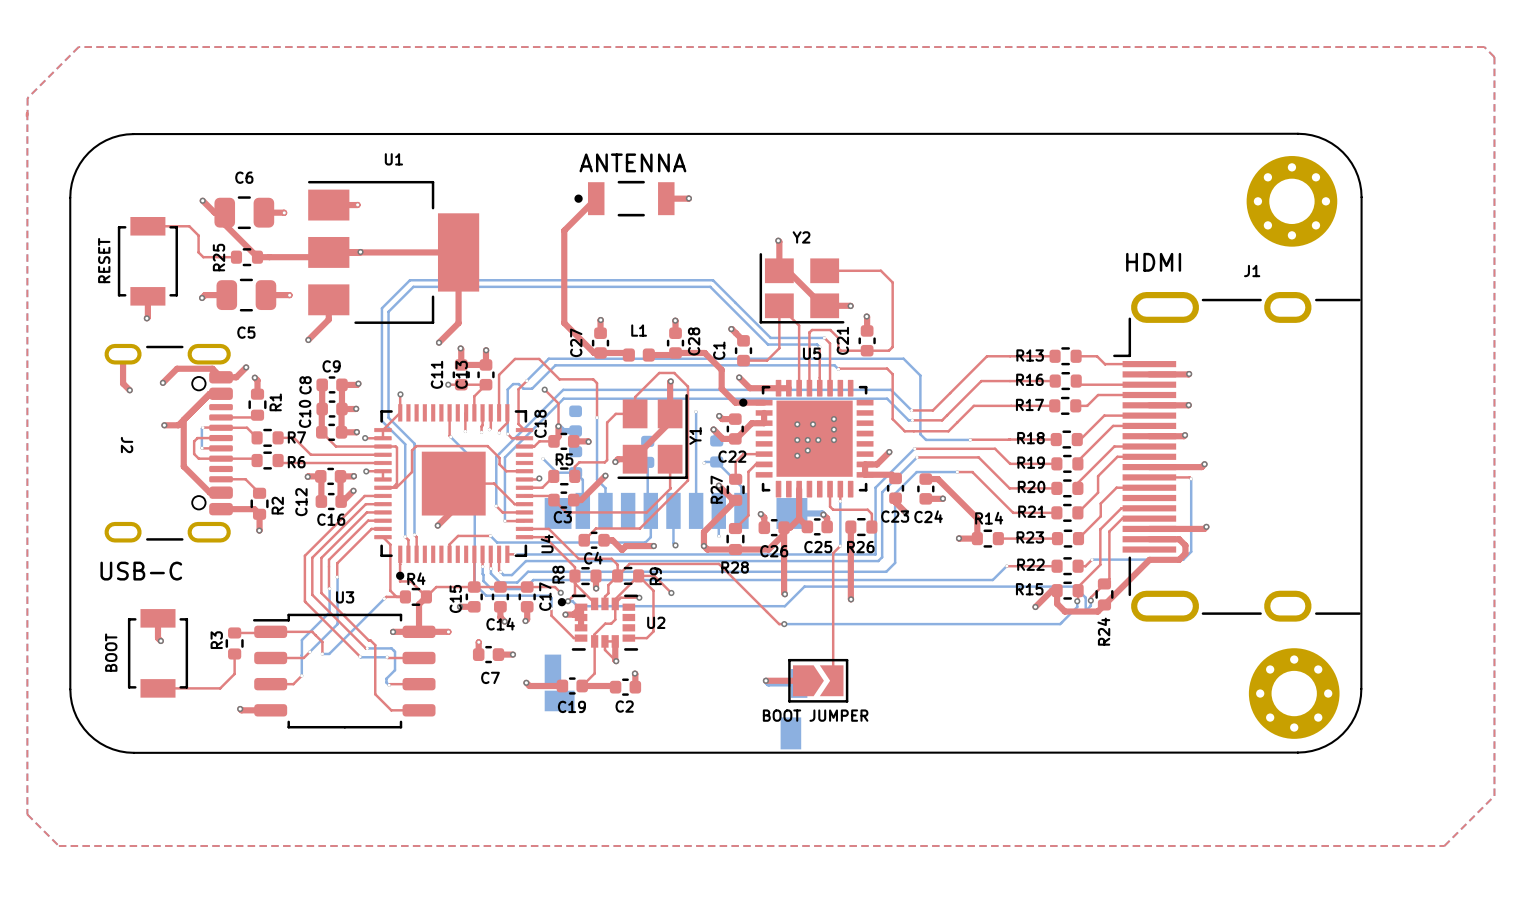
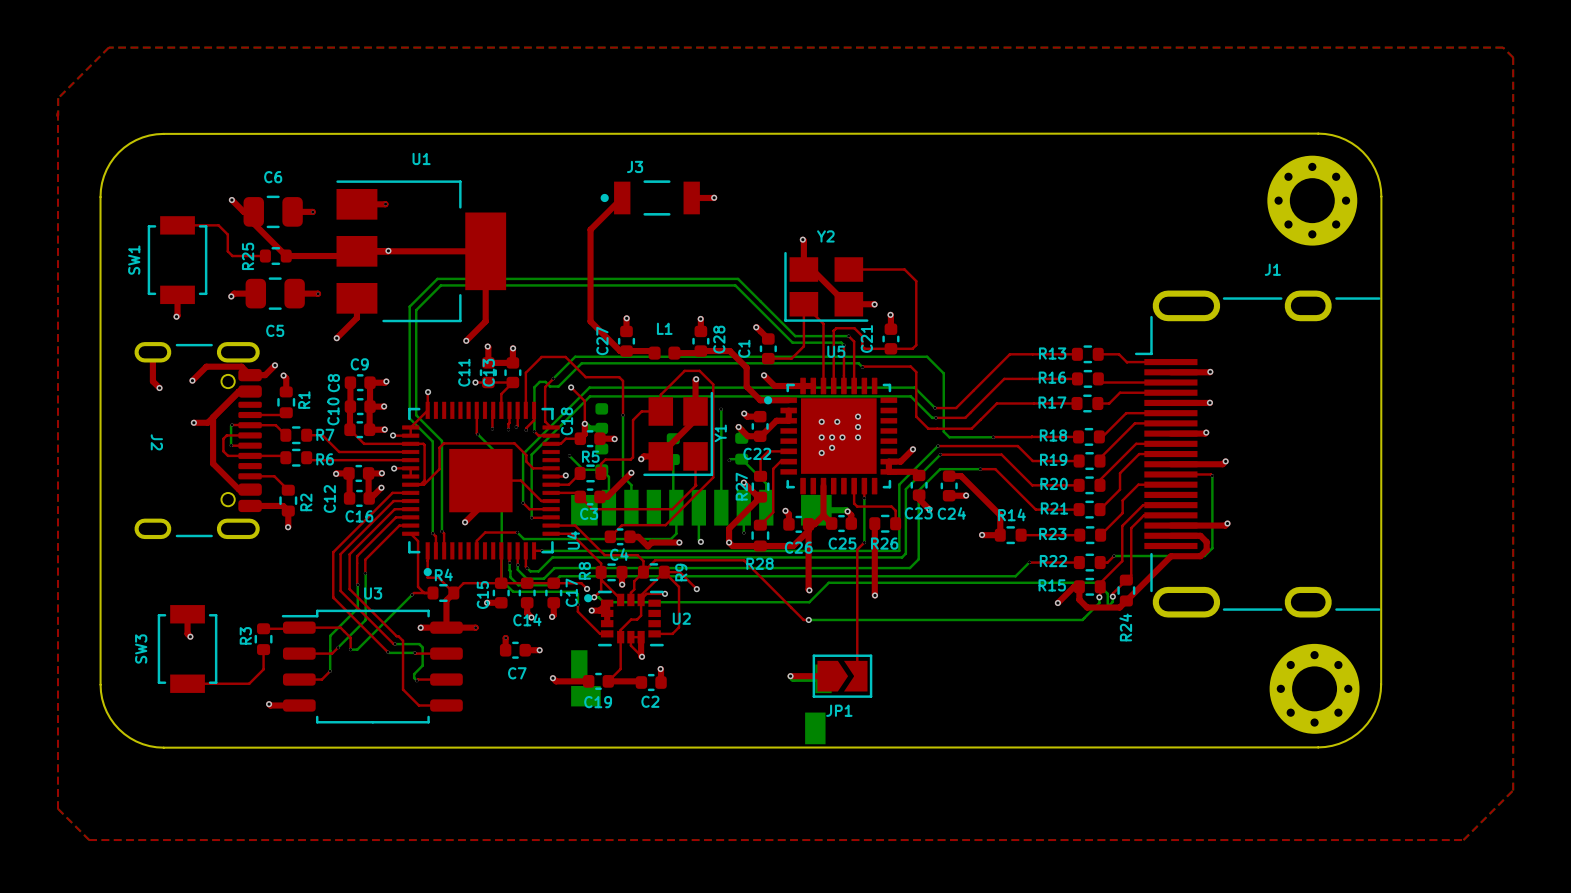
text: ANTENNA (632, 162) -> none
J3 name: none -> J3 (635, 166)
RESET name: RESET (104, 260) -> SW1 (134, 260)
text: HDMI (1153, 262) -> none
text: USB-C (141, 571) -> none
BOOT name: BOOT (111, 652) -> SW3 (141, 649)
BOOT JUMPER name: BOOT JUMPER (815, 715) -> JP1 (839, 710)

